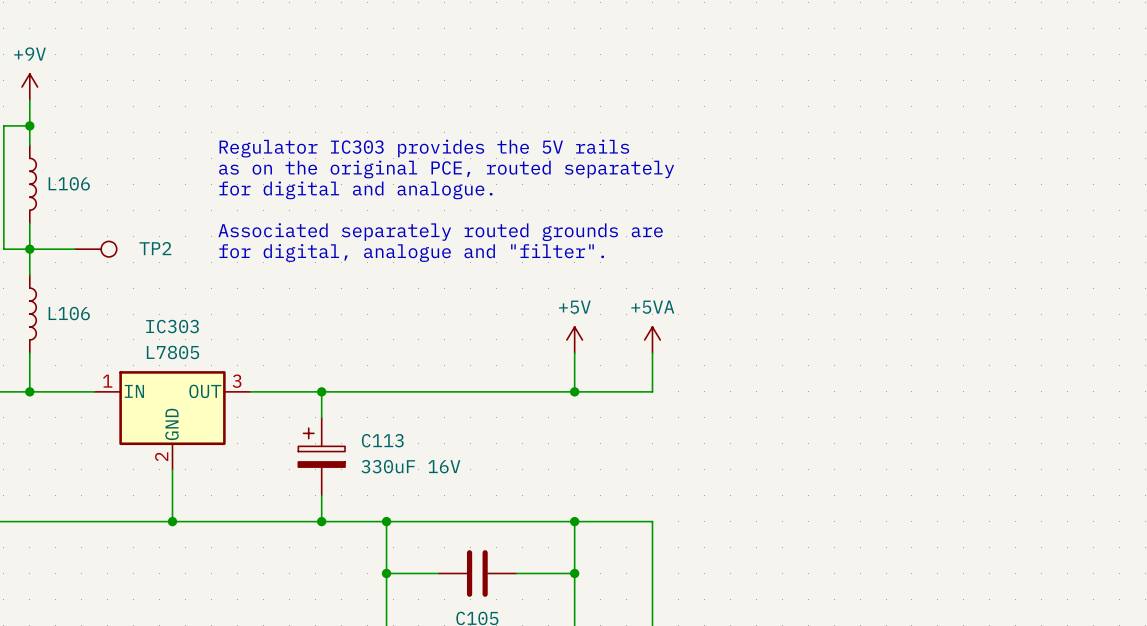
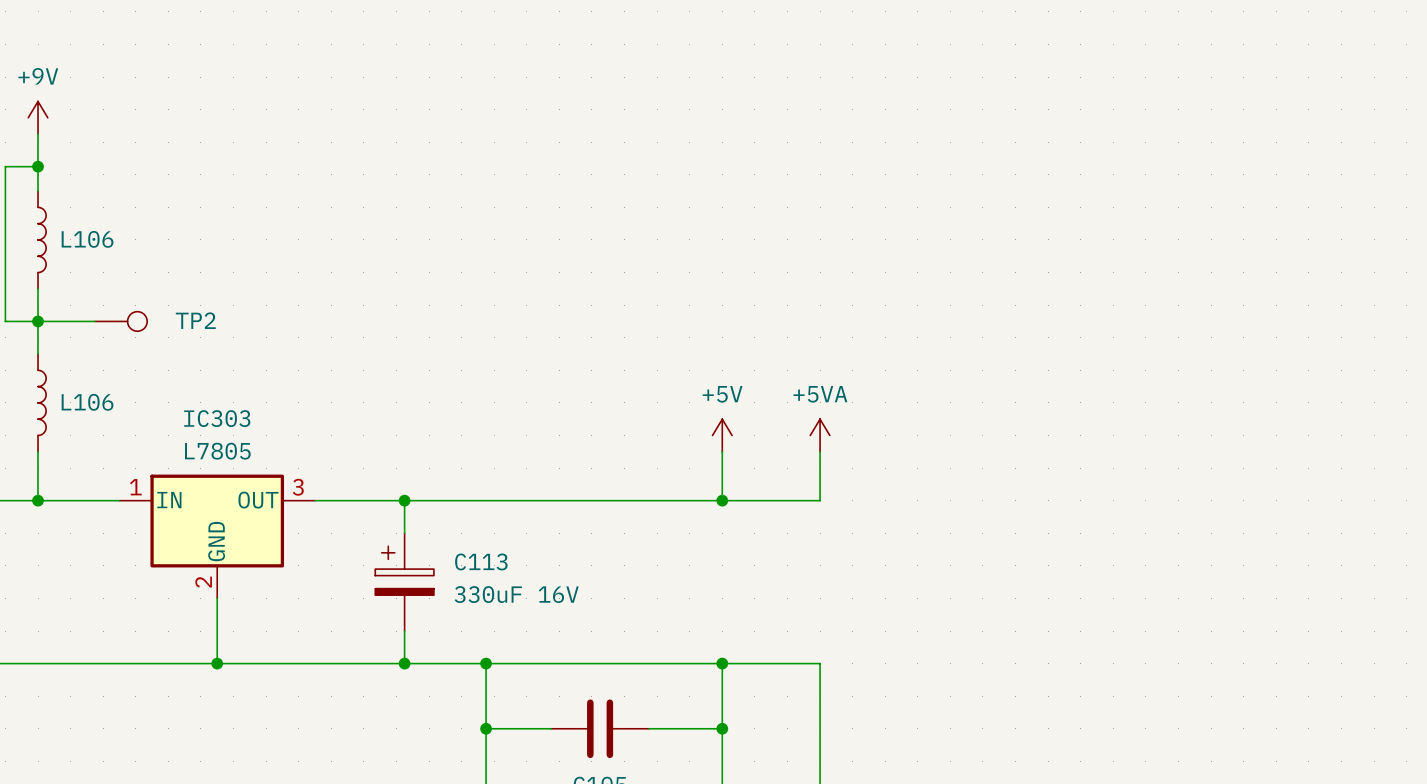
text: Regulator IC303 provides the 5V rails (424, 148) -> none
text: as on the original PCE, routed separately (446, 169) -> none
text: for digital and analogue. (355, 190) -> none
text: Associated separately routed grounds are (440, 232) -> none
text: for digital, analogue and "filter". (411, 253) -> none

